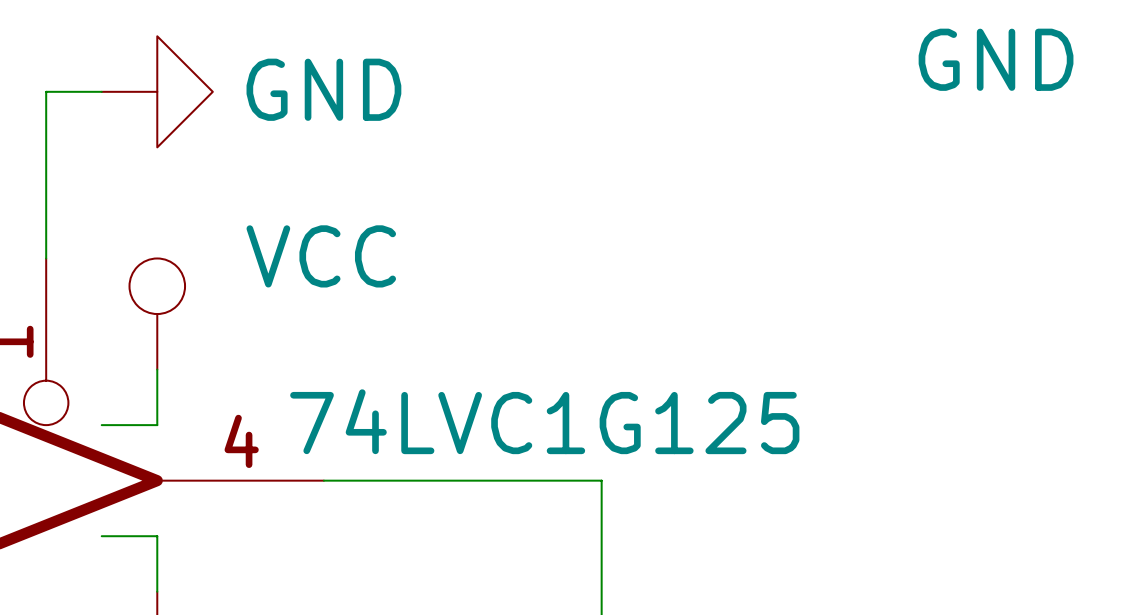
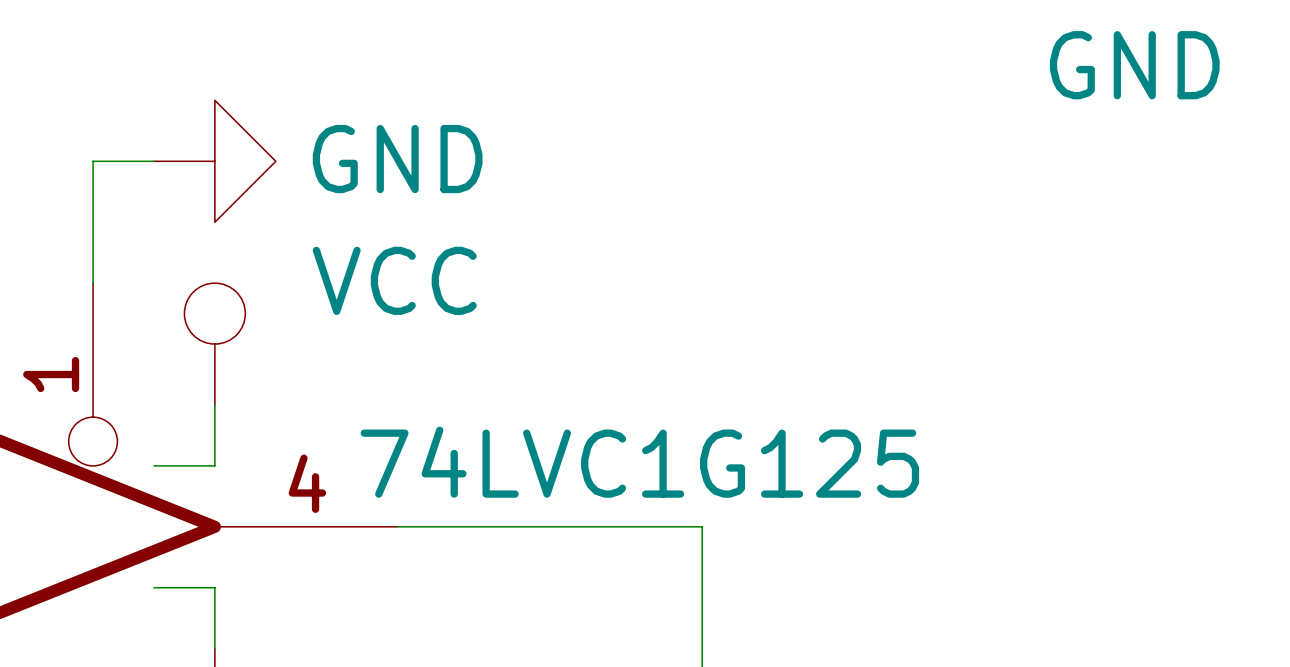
wire: (101, 91) (46, 91) (46, 147) -> (153, 161) (93, 161)
power symbol position: GND (157, 91) -> GND (214, 161)

